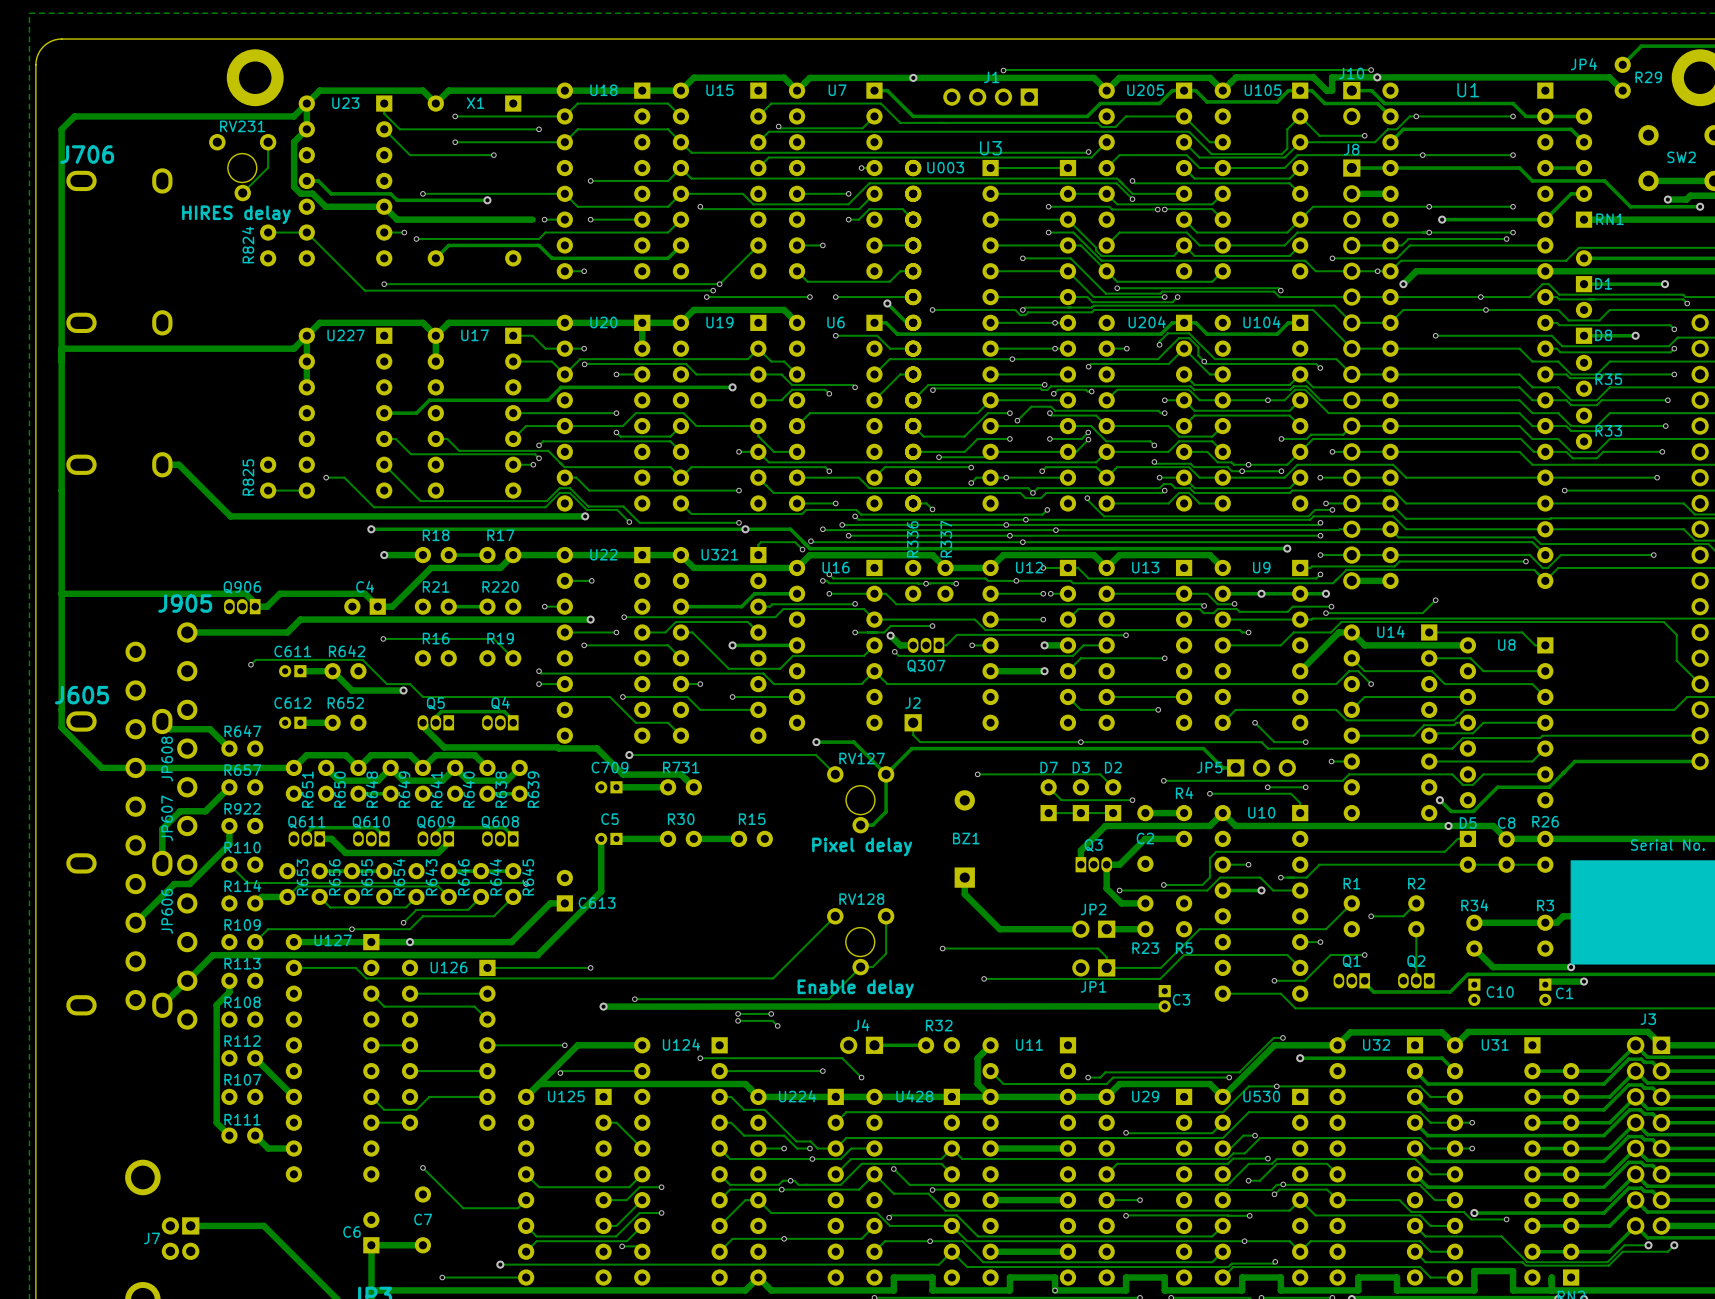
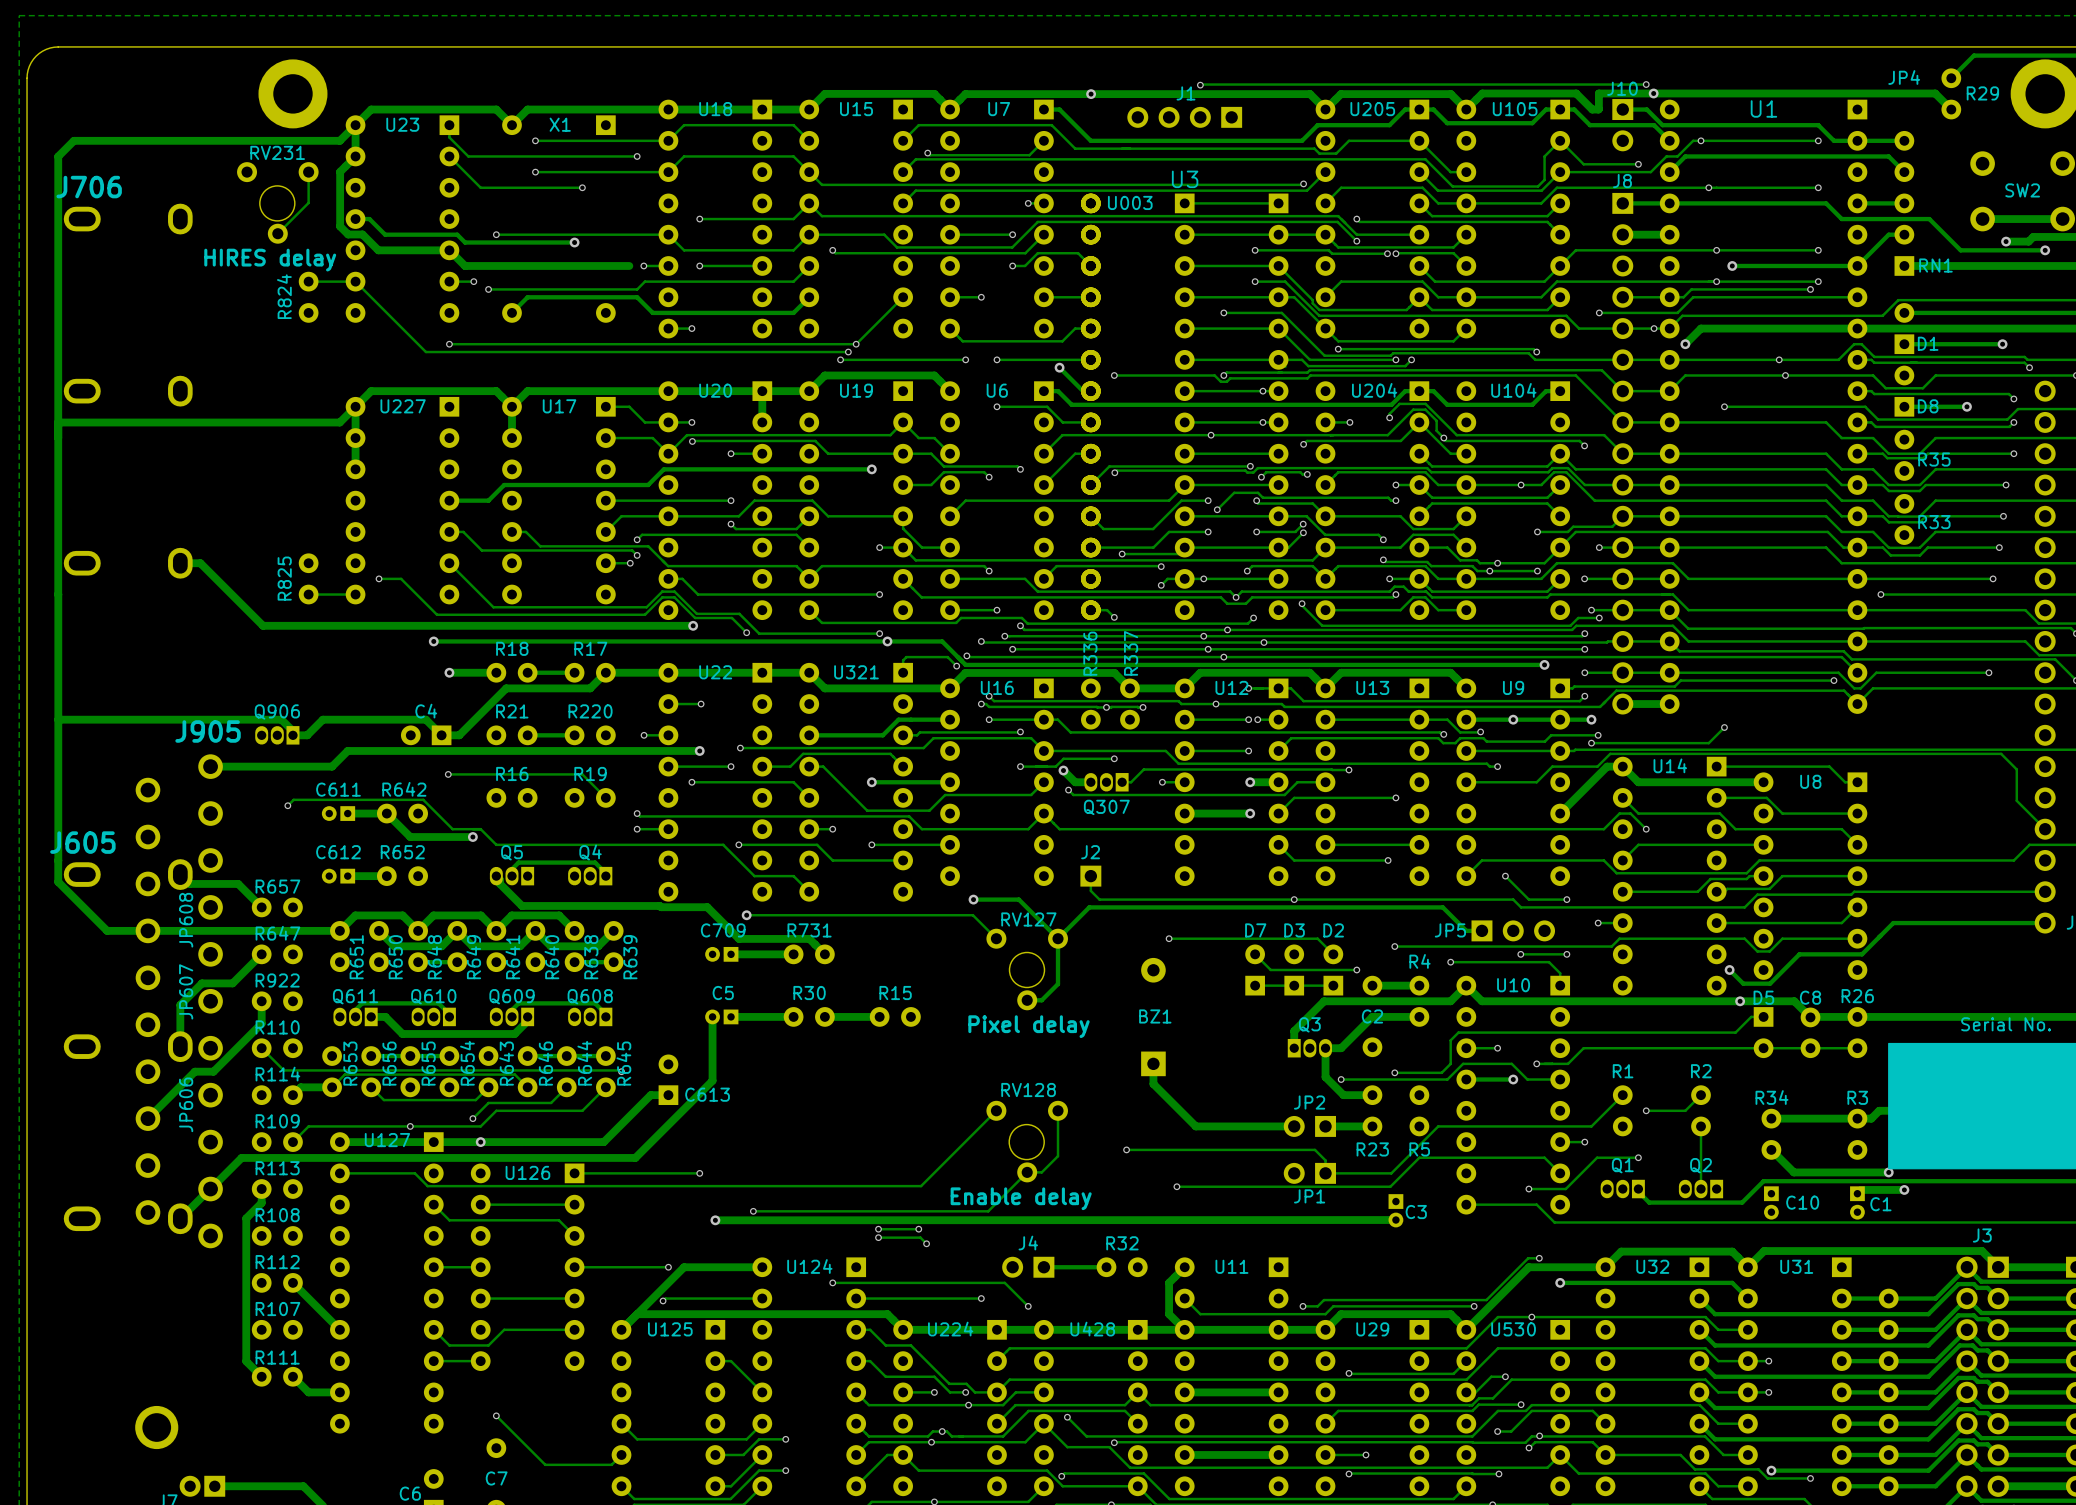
R647 name: R647 (242, 731) -> R657 (277, 886)
R657 name: R657 (242, 770) -> R647 (277, 933)

